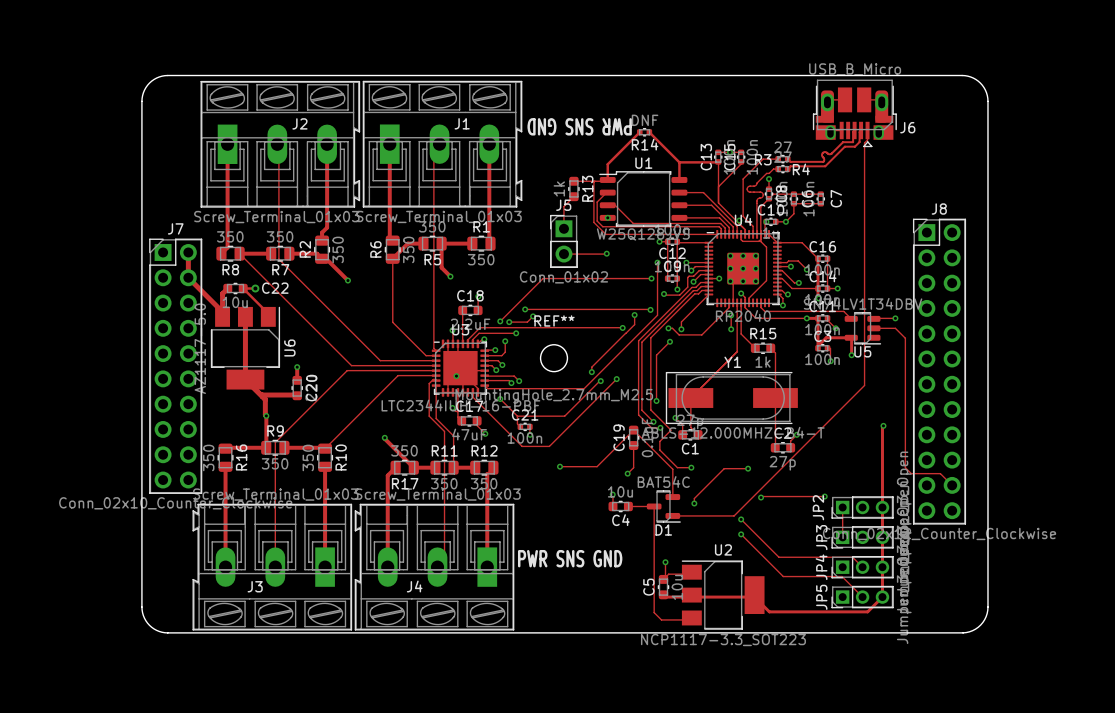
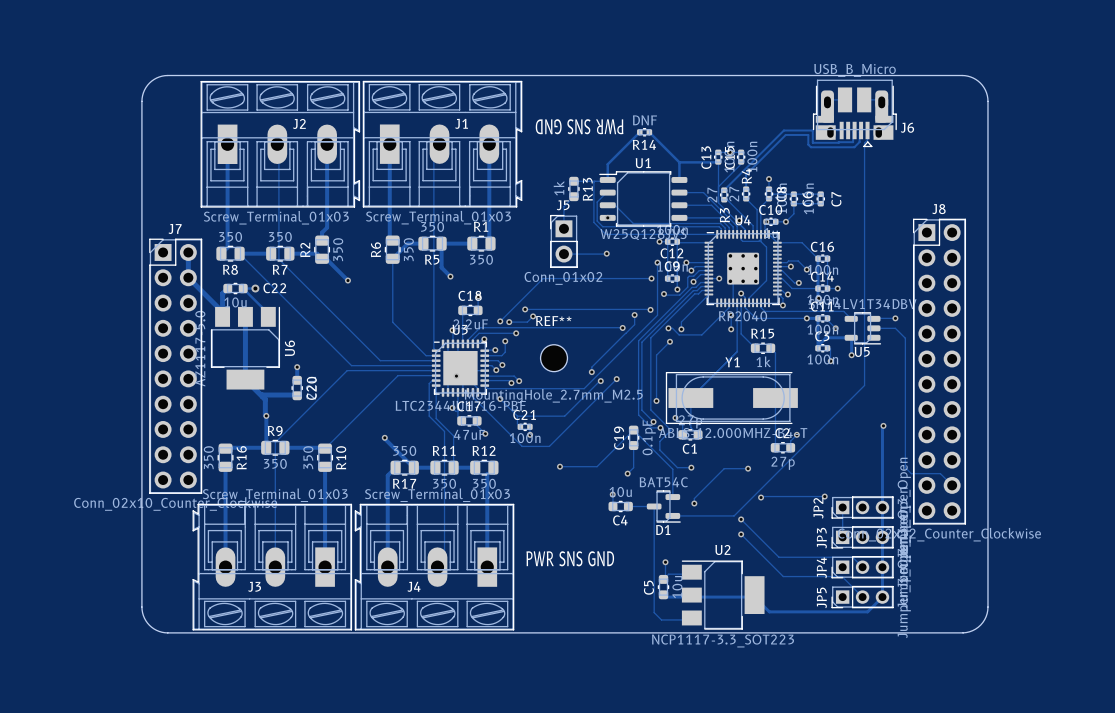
track: (843, 142) (831, 153) (822, 152) (823, 161) (790, 161) (787, 159) -> (843, 142) (812, 142) (812, 130) (783, 130) (724, 190)
track: (854, 146) (844, 146) (825, 166) (790, 166) (787, 169) -> (854, 146) (810, 147) (808, 144) (808, 134) (785, 134) (746, 174) (746, 189)
R3 name position: R3 (763, 159) -> R3 (724, 215)
track: (778, 159) (763, 159) (743, 179) (743, 216) (753, 226) -> (724, 199) (727, 199) (753, 226)
R3 rotation: 0° (782, 159) -> 90° clockwise (724, 194)
R3 position: (782, 159) -> (724, 194)
track: (778, 169) (773, 169) (755, 185) (747, 188) (749, 191) (760, 192) (763, 194) (756, 200) (756, 234) -> (746, 198) (757, 209) (757, 234)
R4 rotation: 0° (782, 169) -> 90° clockwise (746, 193)
R4 position: (782, 169) -> (746, 193)
R4 name position: R4 (801, 169) -> R4 (746, 176)

